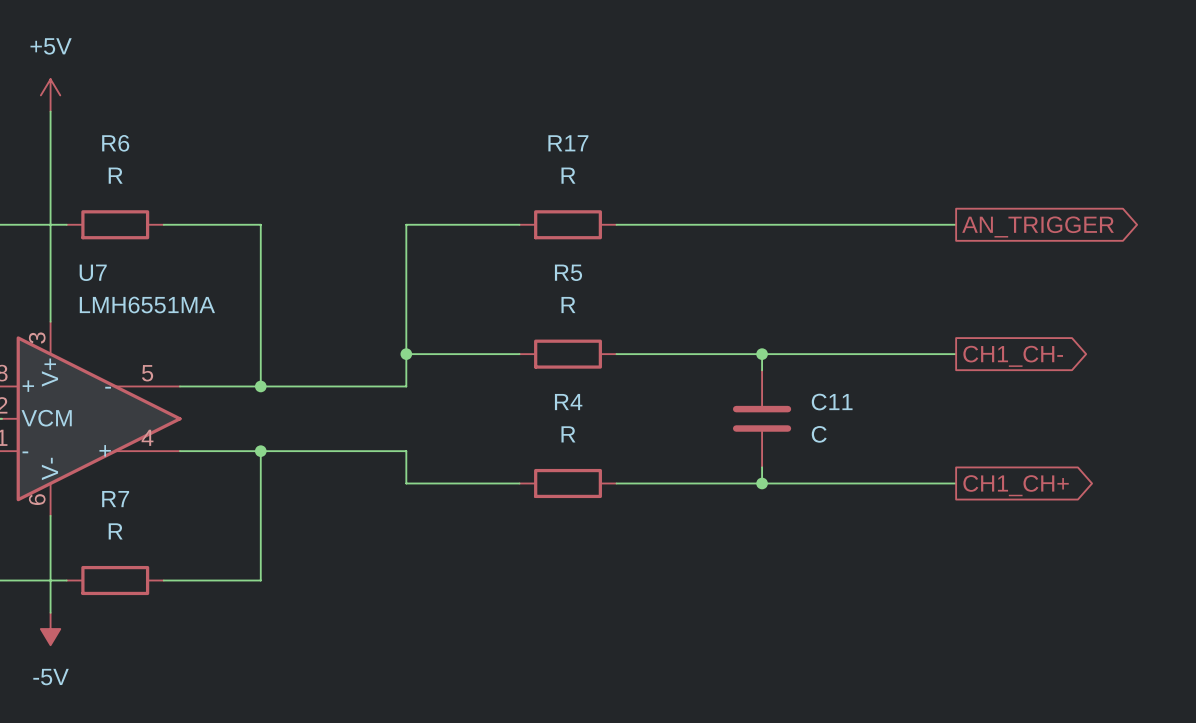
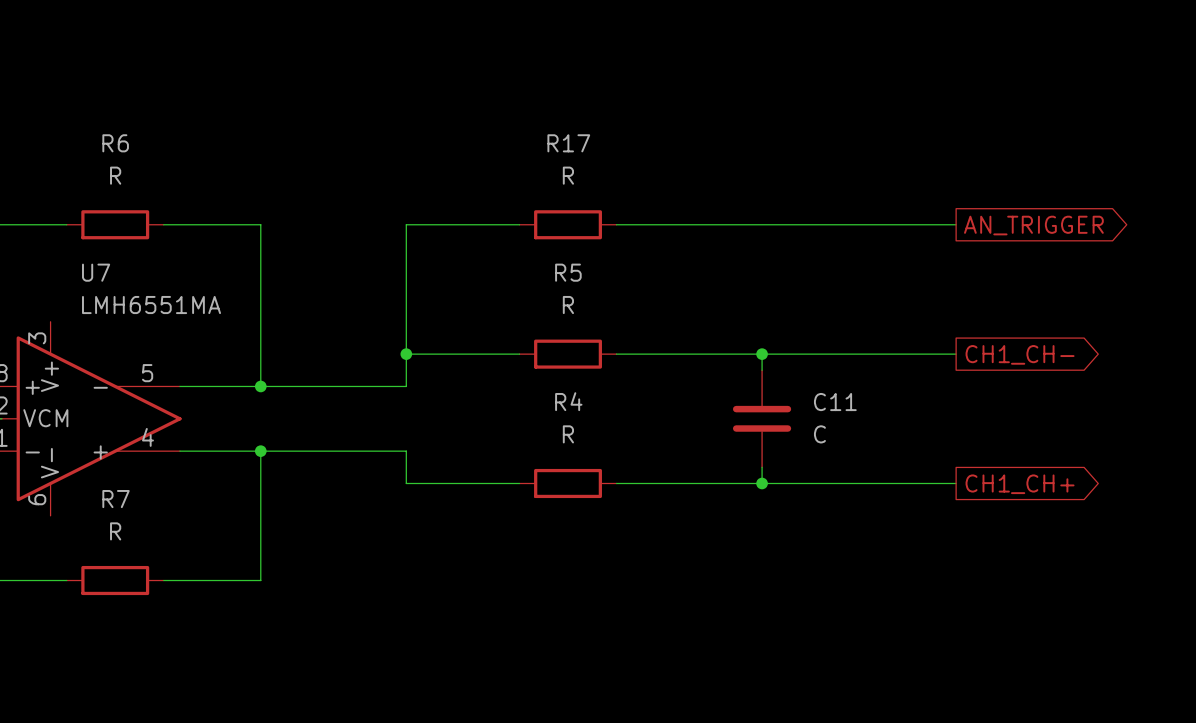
power symbol: +5V (50, 95) -> none
wire: (50, 111) (50, 321) -> none
wire: (50, 515) (50, 612) -> none
power symbol: -5V (50, 629) -> none

